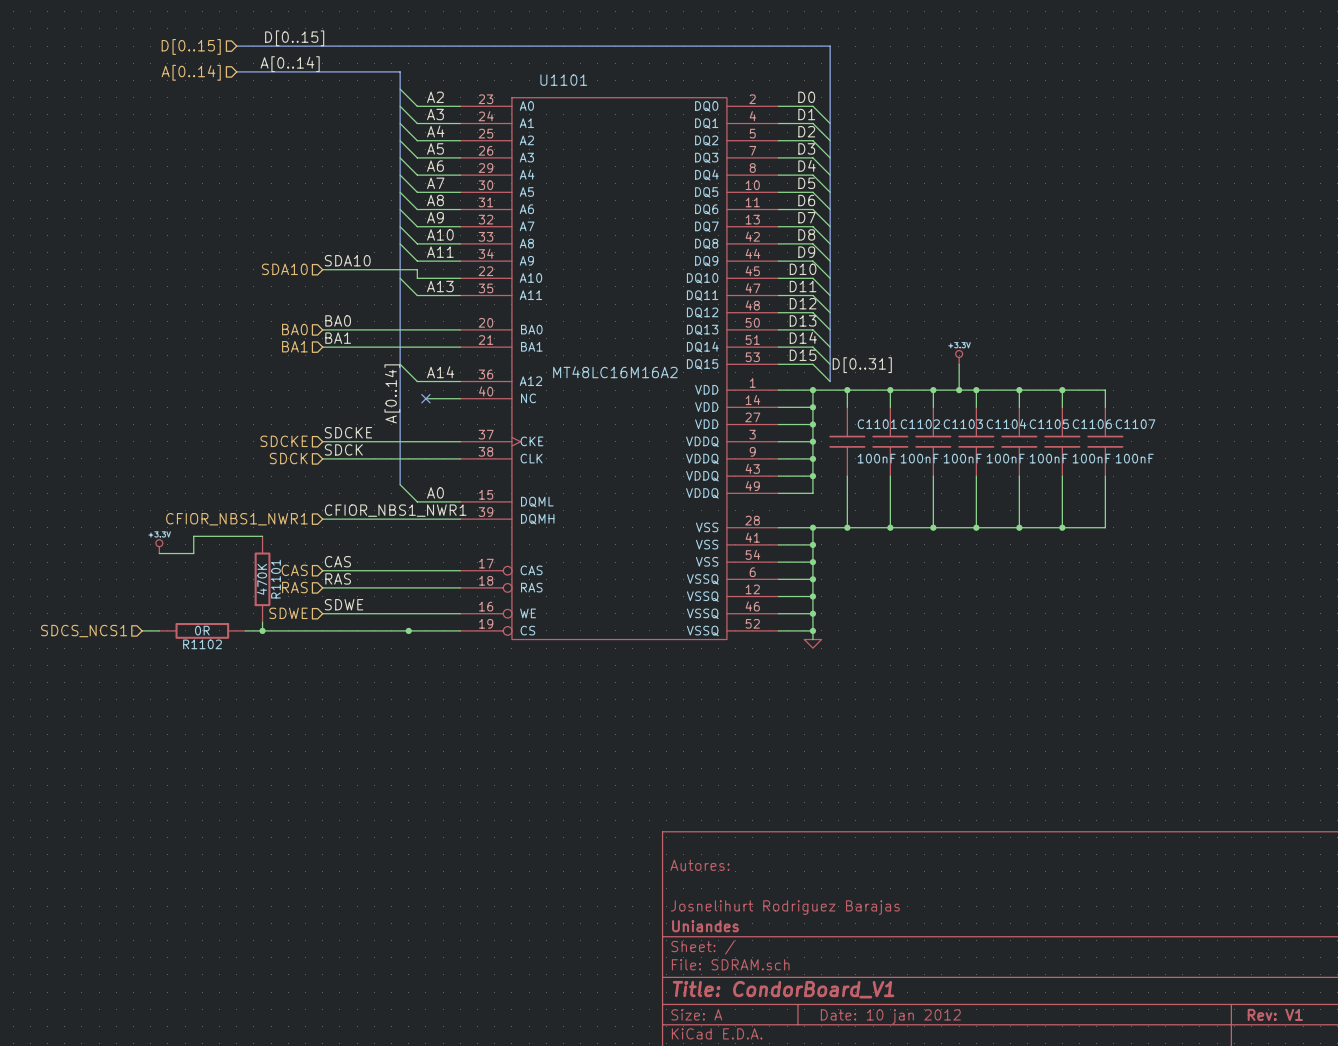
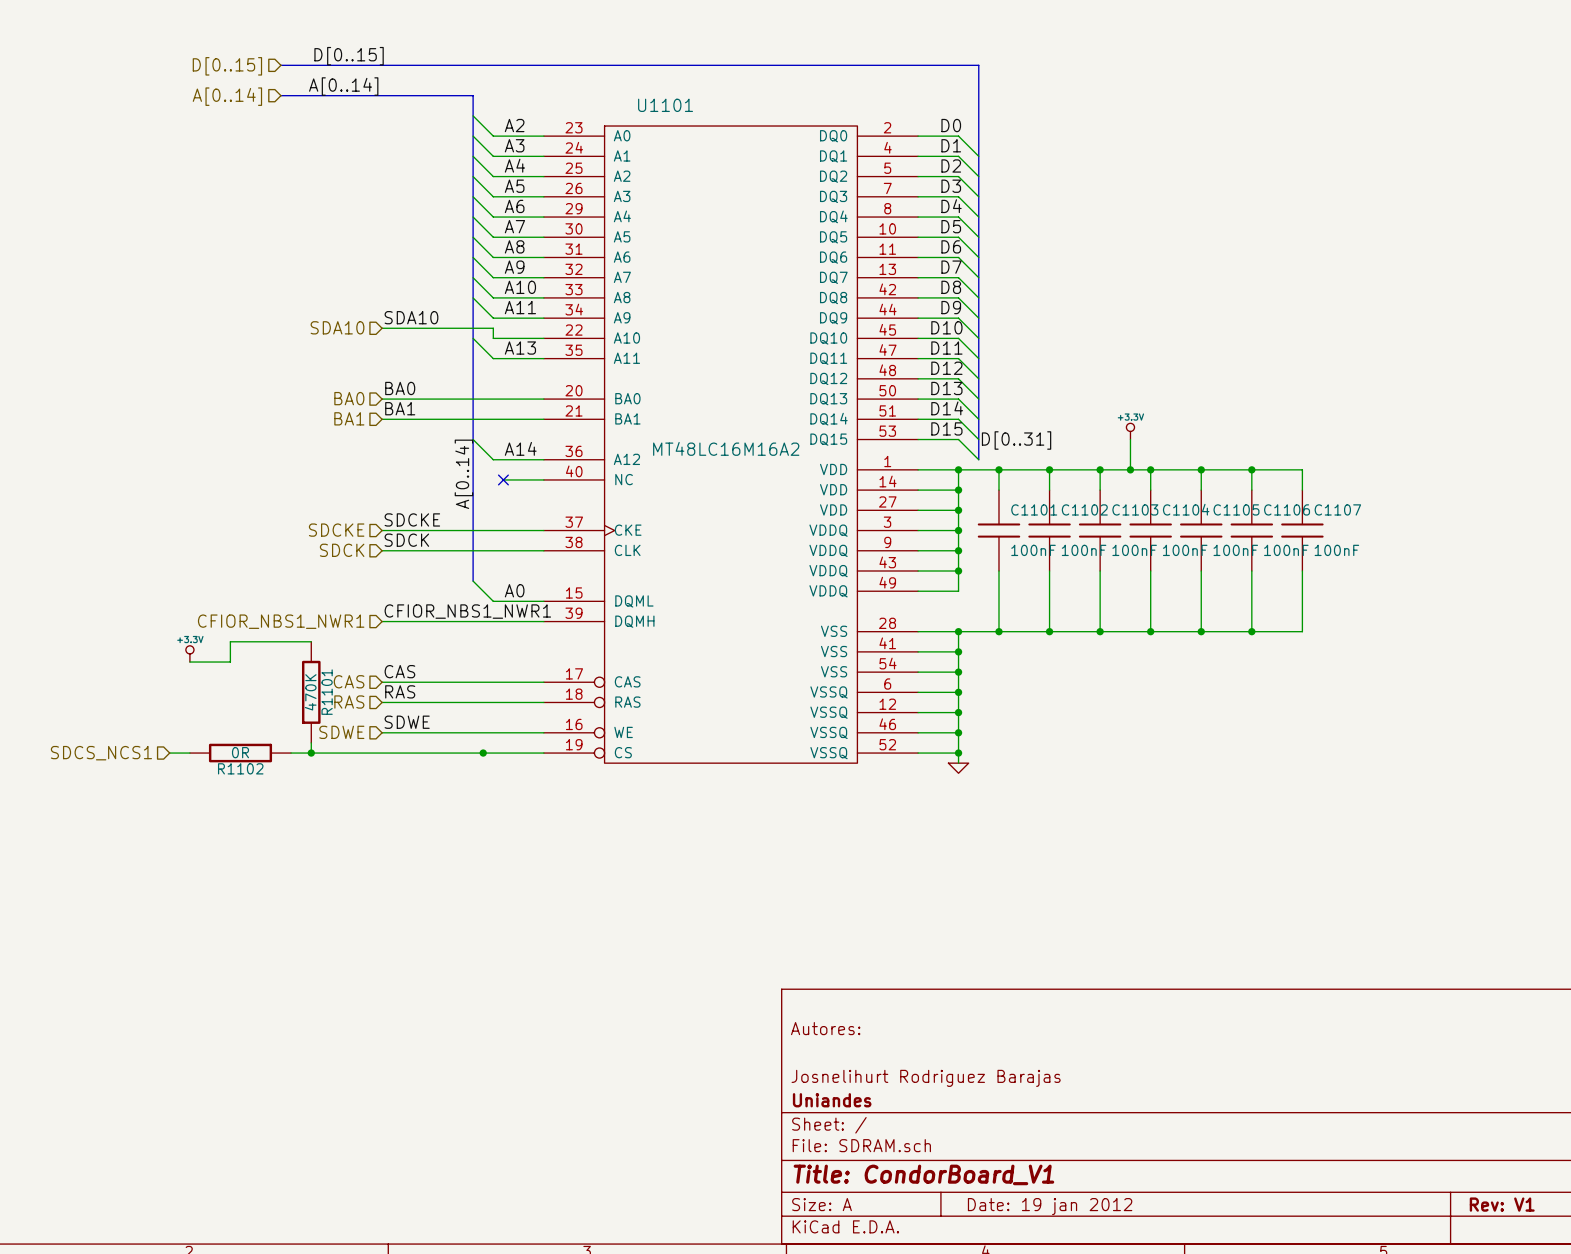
title block: Date: 10 jan 2012 (890, 1016) -> Date: 19 jan 2012 (1050, 1206)

